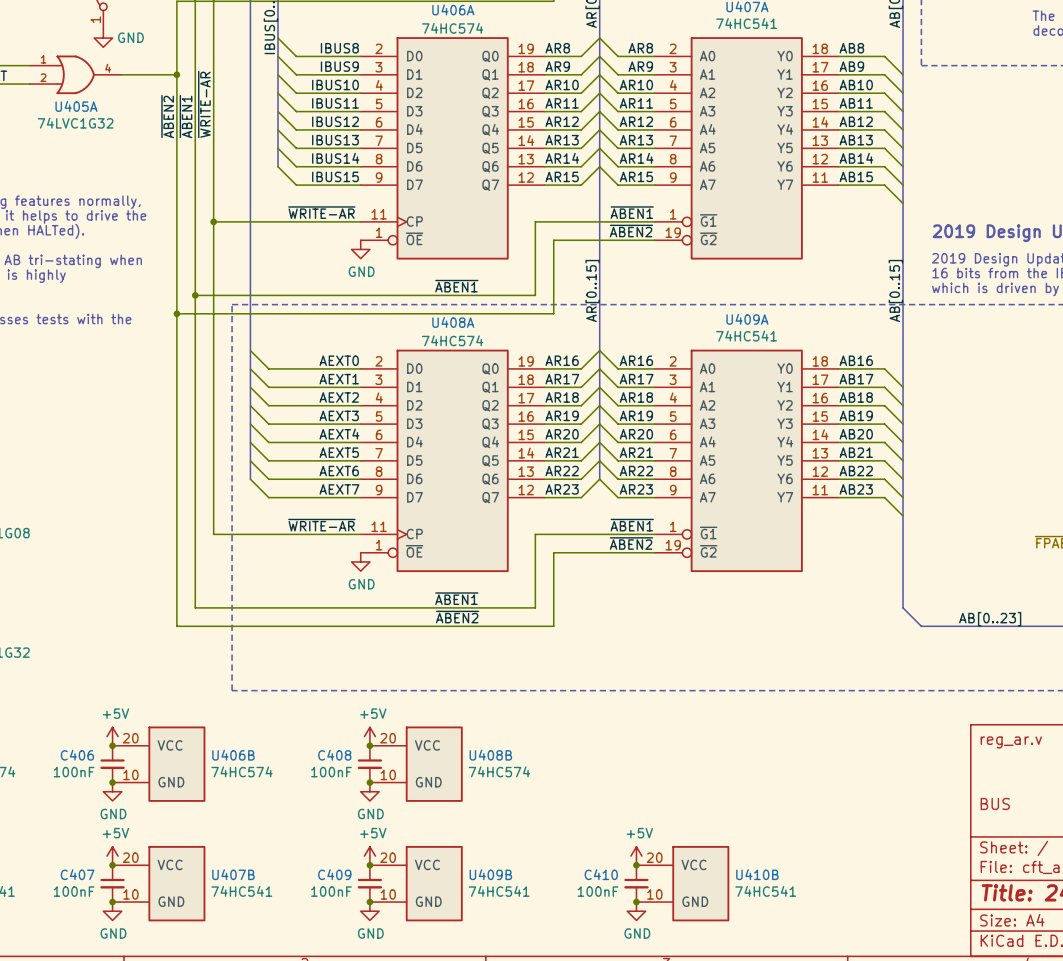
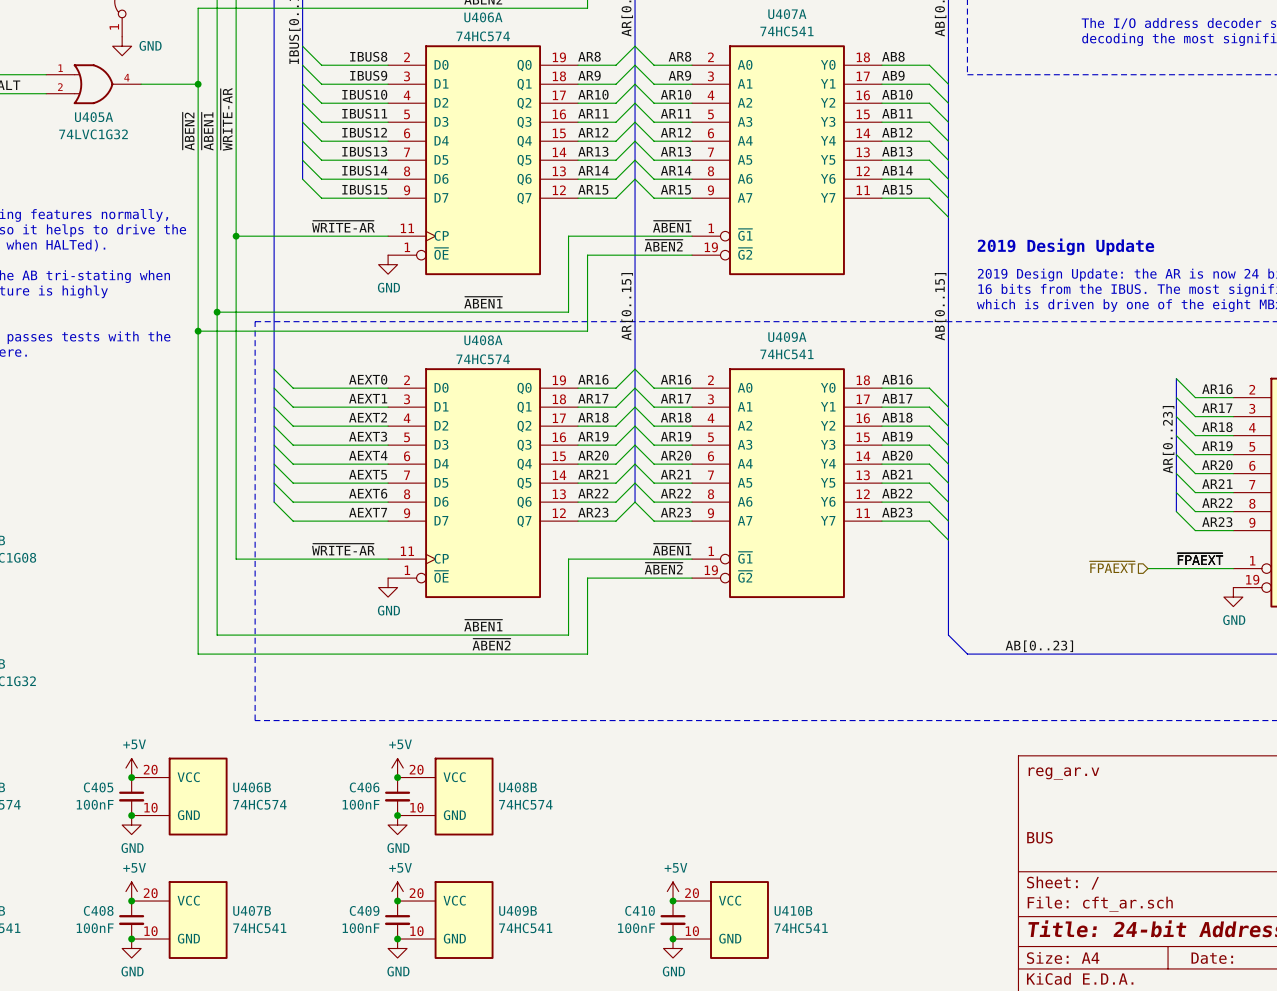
C406 name: C406 (77, 755) -> C405 (98, 787)
C408 name: C408 (334, 755) -> C406 (364, 787)
C407 name: C407 (77, 874) -> C408 (98, 910)

